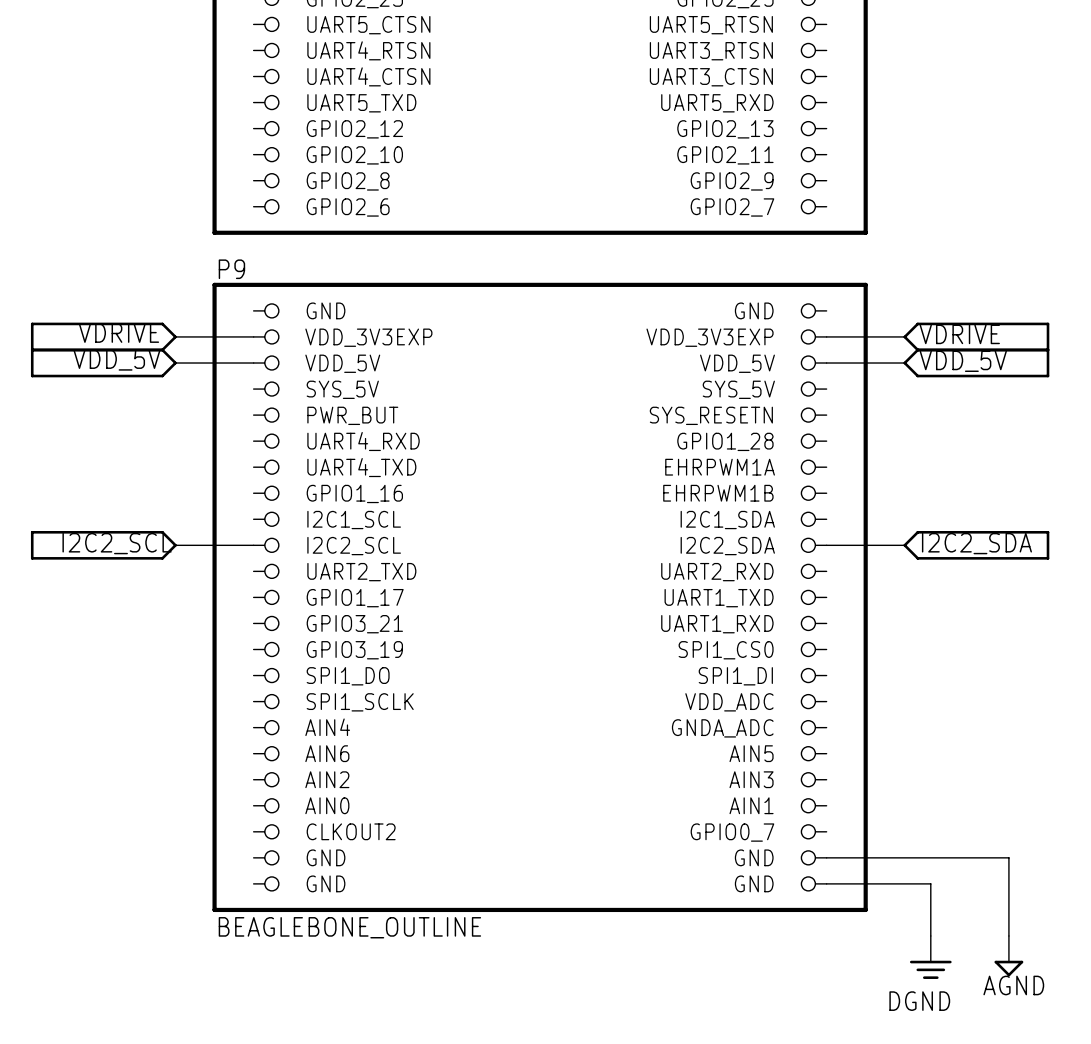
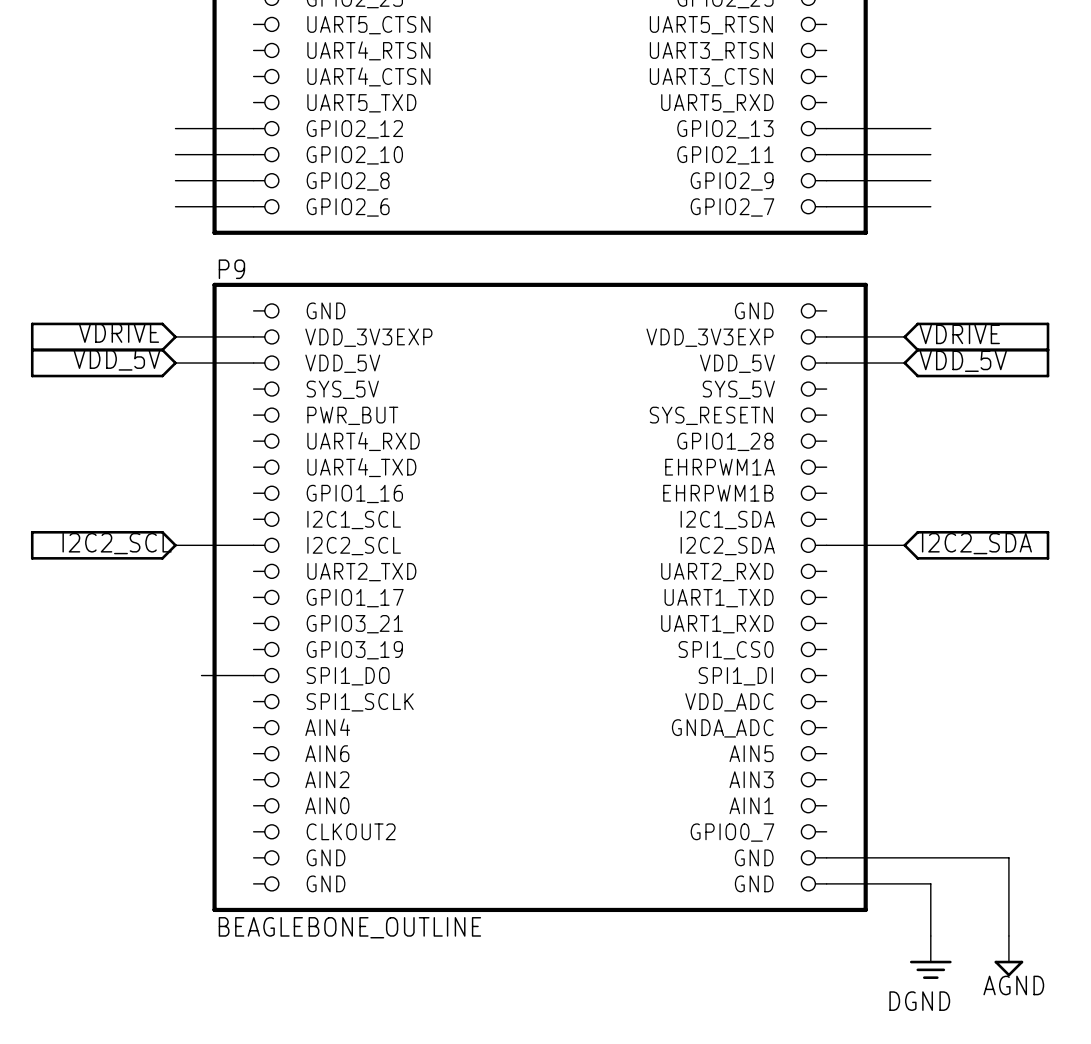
wire: none -> (175, 128) (253, 128)
wire: none -> (826, 128) (930, 128)
wire: none -> (175, 154) (253, 154)
wire: none -> (826, 154) (930, 154)
wire: none -> (175, 180) (253, 180)
wire: none -> (826, 180) (930, 180)
wire: none -> (175, 206) (253, 206)
wire: none -> (826, 206) (930, 206)
wire: none -> (201, 675) (253, 675)

